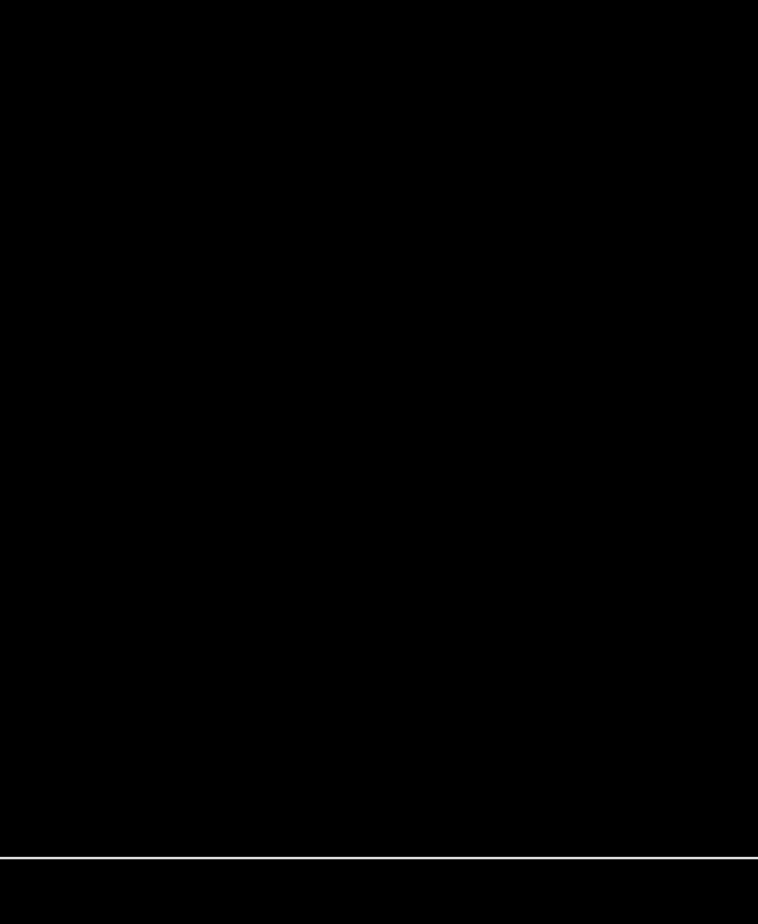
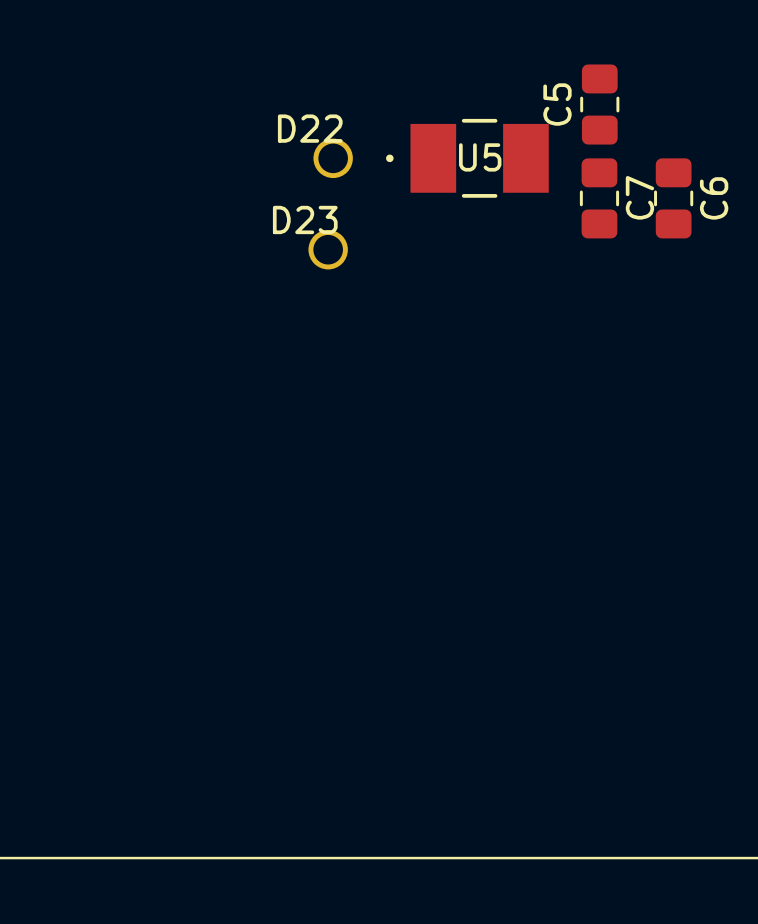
C5: none -> (599, 104)
D22: none -> (333, 158)
U5: none -> (467, 158)
C7: none -> (599, 198)
C6: none -> (673, 198)
D23: none -> (328, 249)

